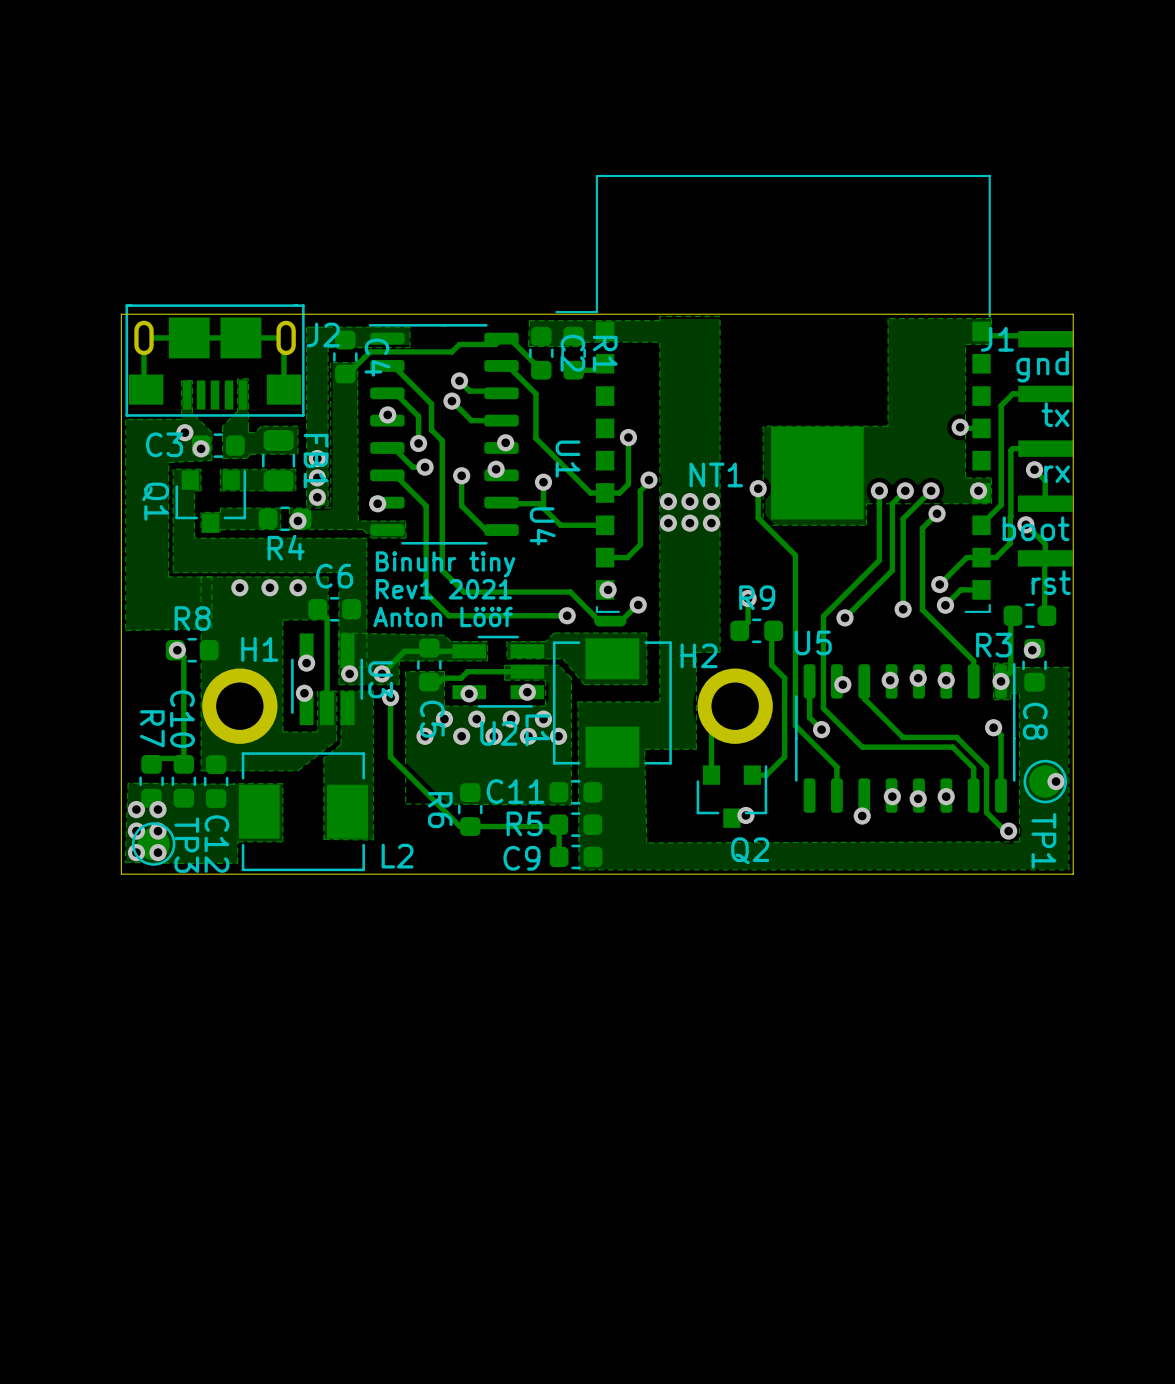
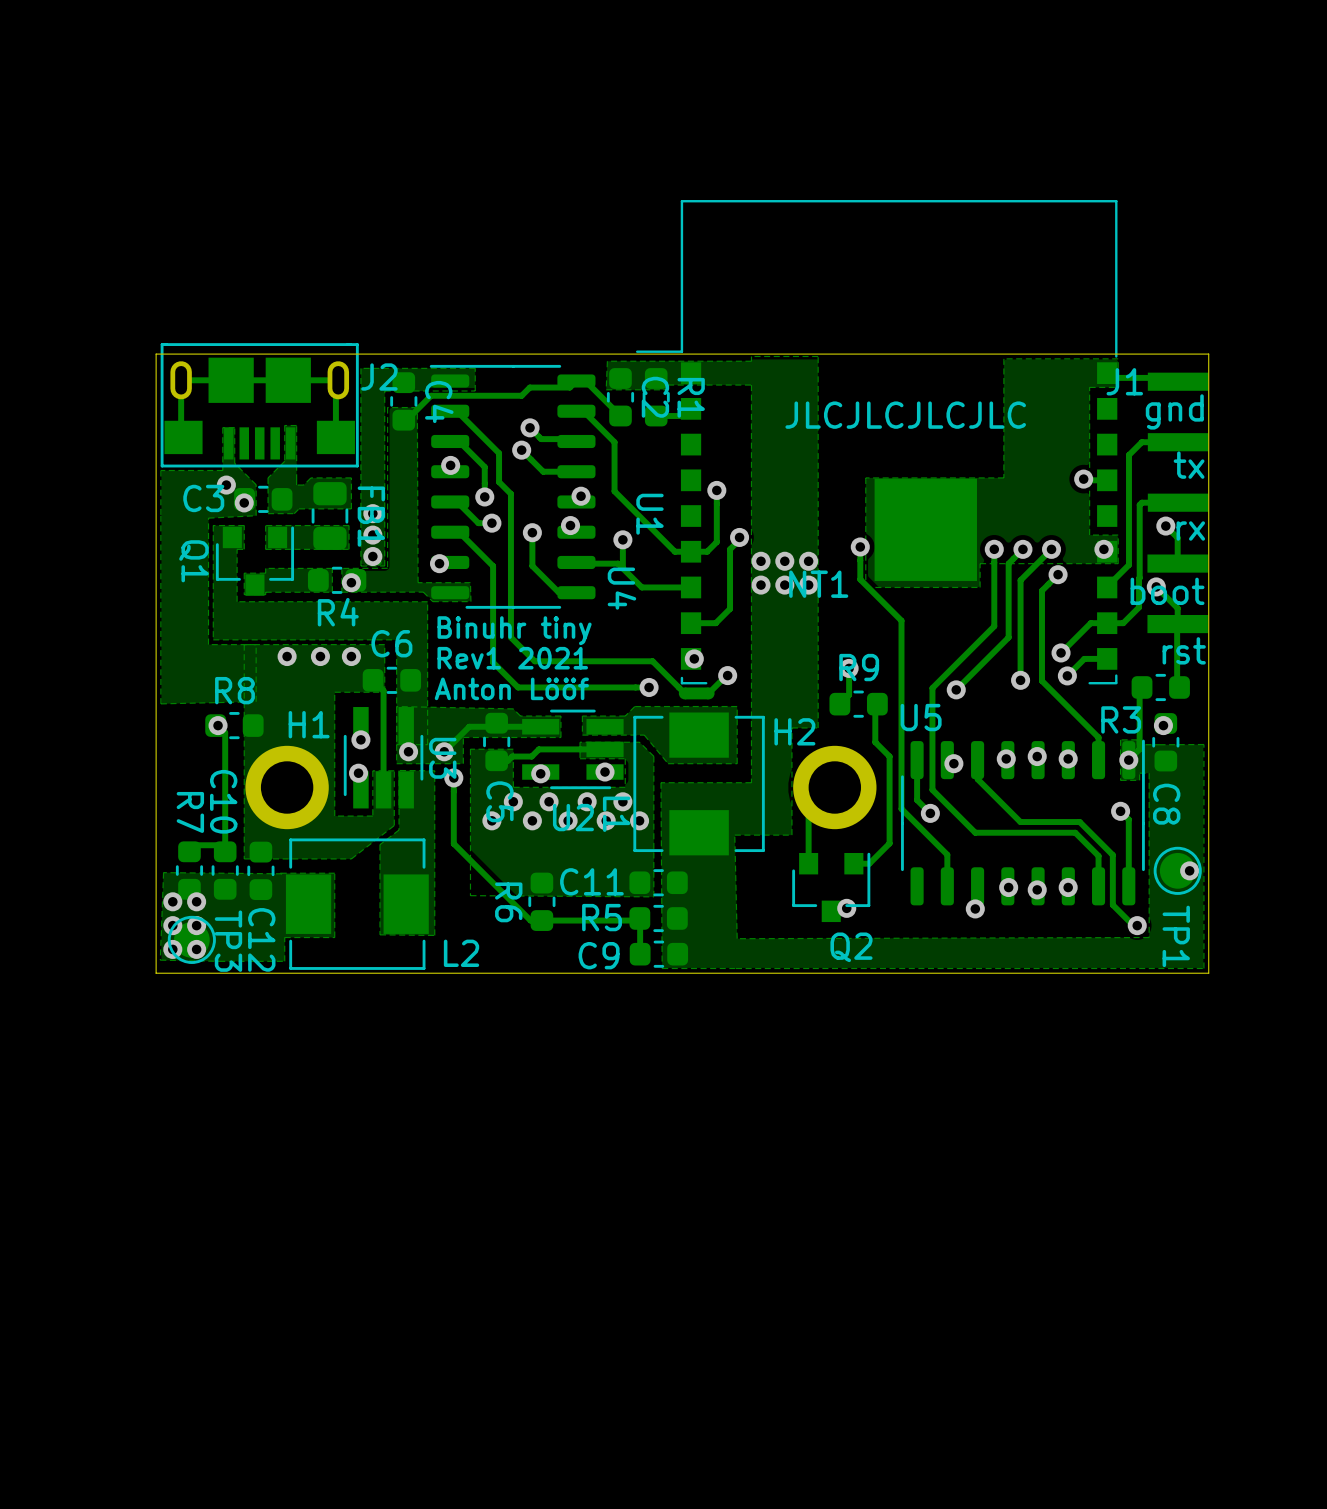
text: none -> JLCJLCJLCJLC (905, 415)
NT1 name position: NT1 (716, 474) -> NT1 (818, 584)

